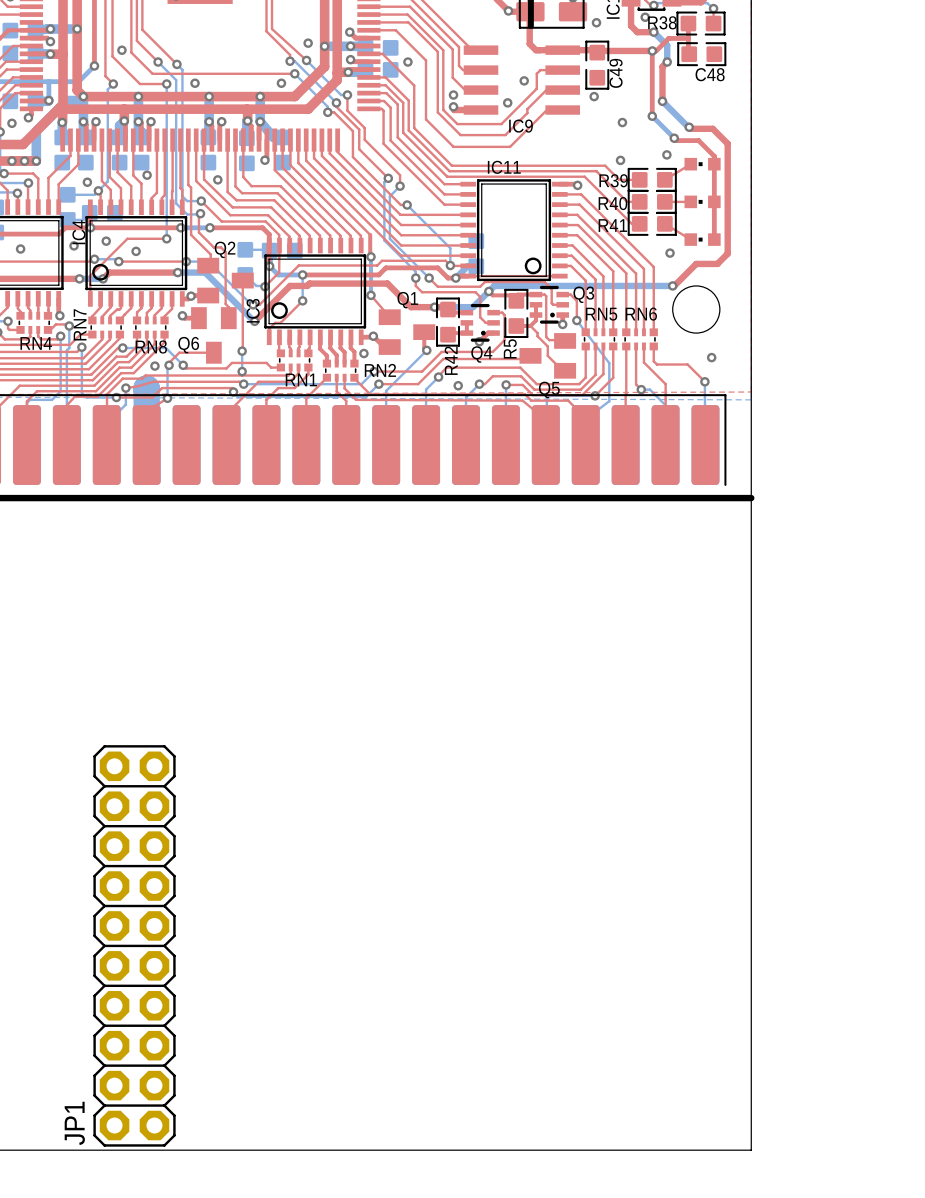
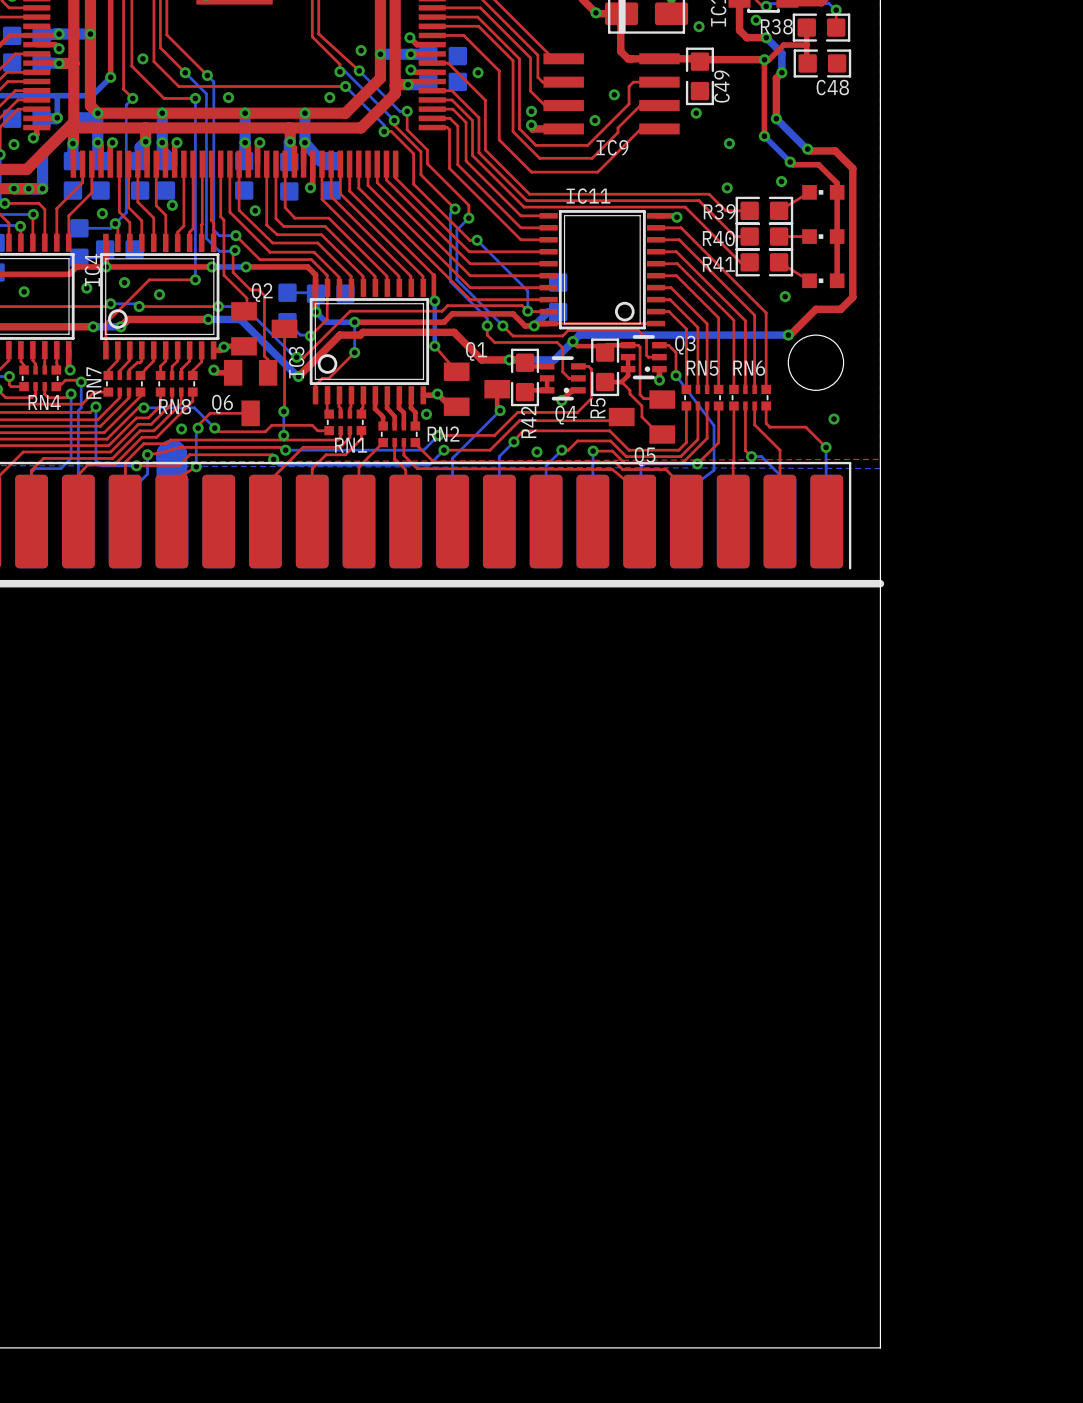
JP1: (134, 945) -> none

